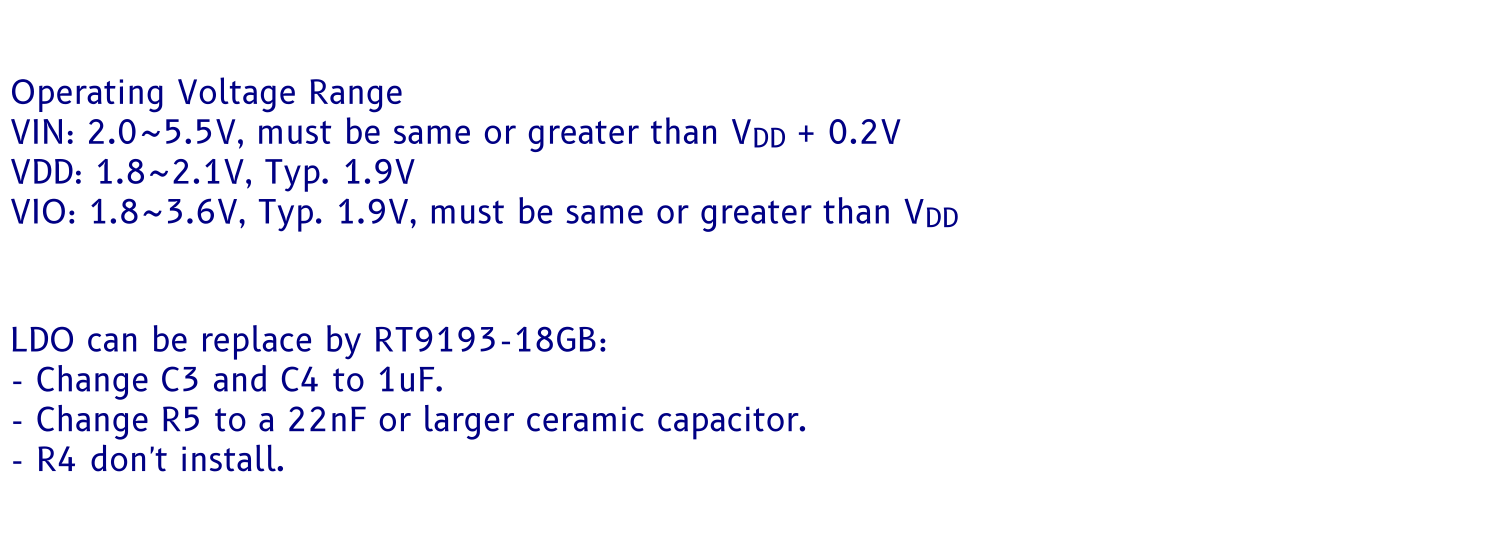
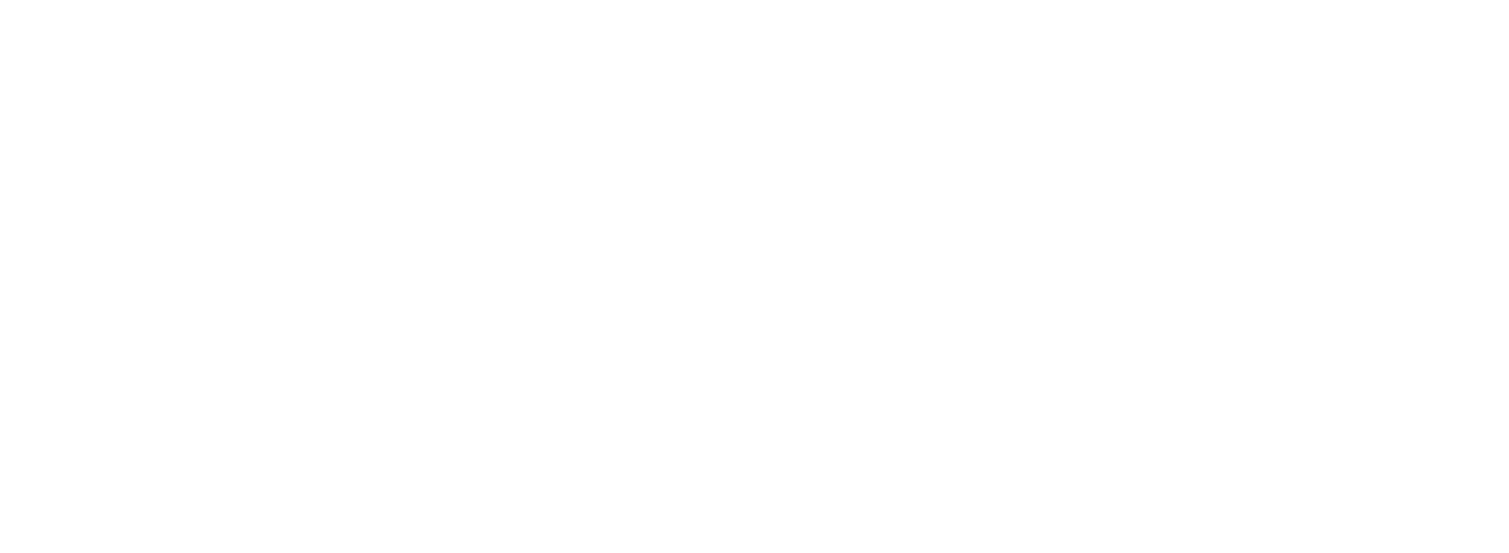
text: Operating Voltage Range (206, 94) -> none
text: VIN: 2.0~5.5V, must be same or greater than VDD + 0.2V (455, 134) -> none
text: VDD: 1.8~2.1V, Typ. 1.9V (212, 175) -> none
text: VIO: 1.8~3.6V, Typ. 1.9V, must be same or greater than VDD (484, 214) -> none
text: LDO can be replace by RT9193-18GB: (308, 342) -> none
text: - Change C3 and C4 to 1uF. (227, 382) -> none
text: - Change R5 to a 22nF or larger ceramic capacitor. (409, 422) -> none
text: - R4 don't install. (148, 458) -> none

